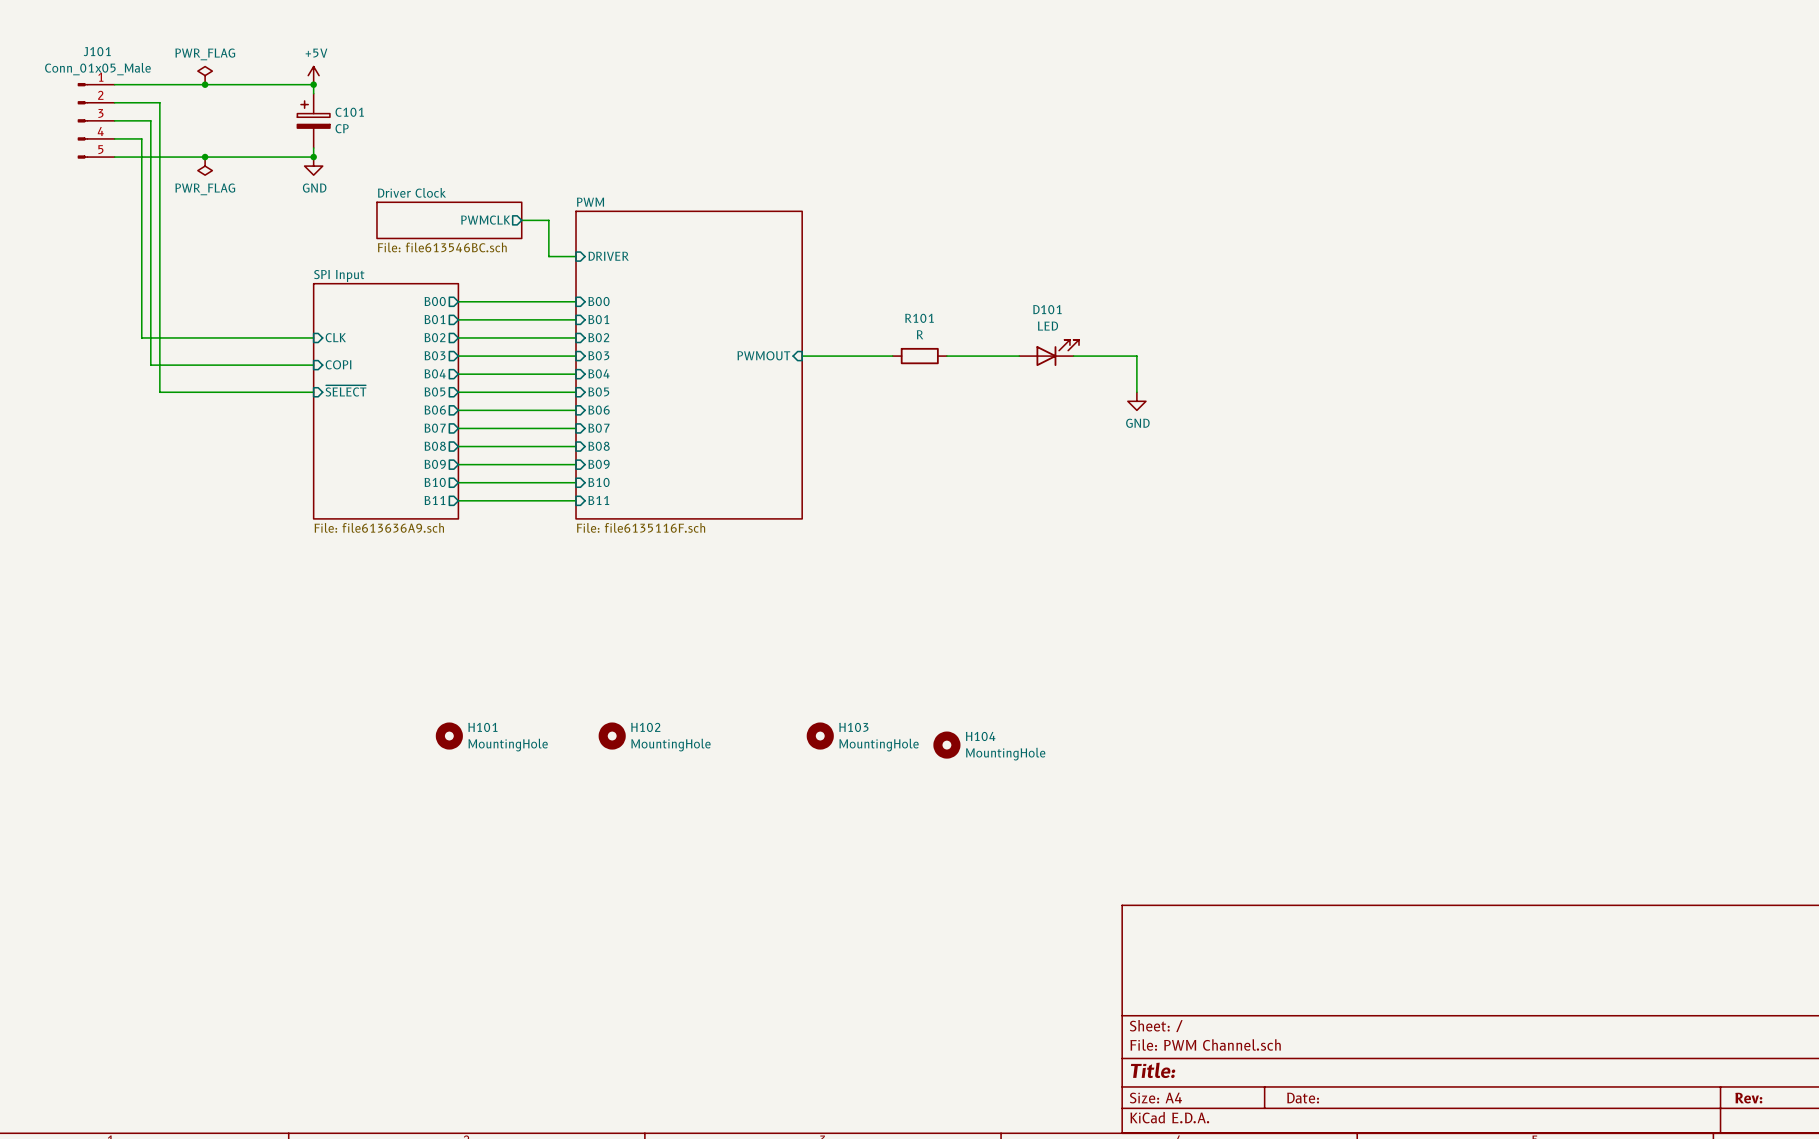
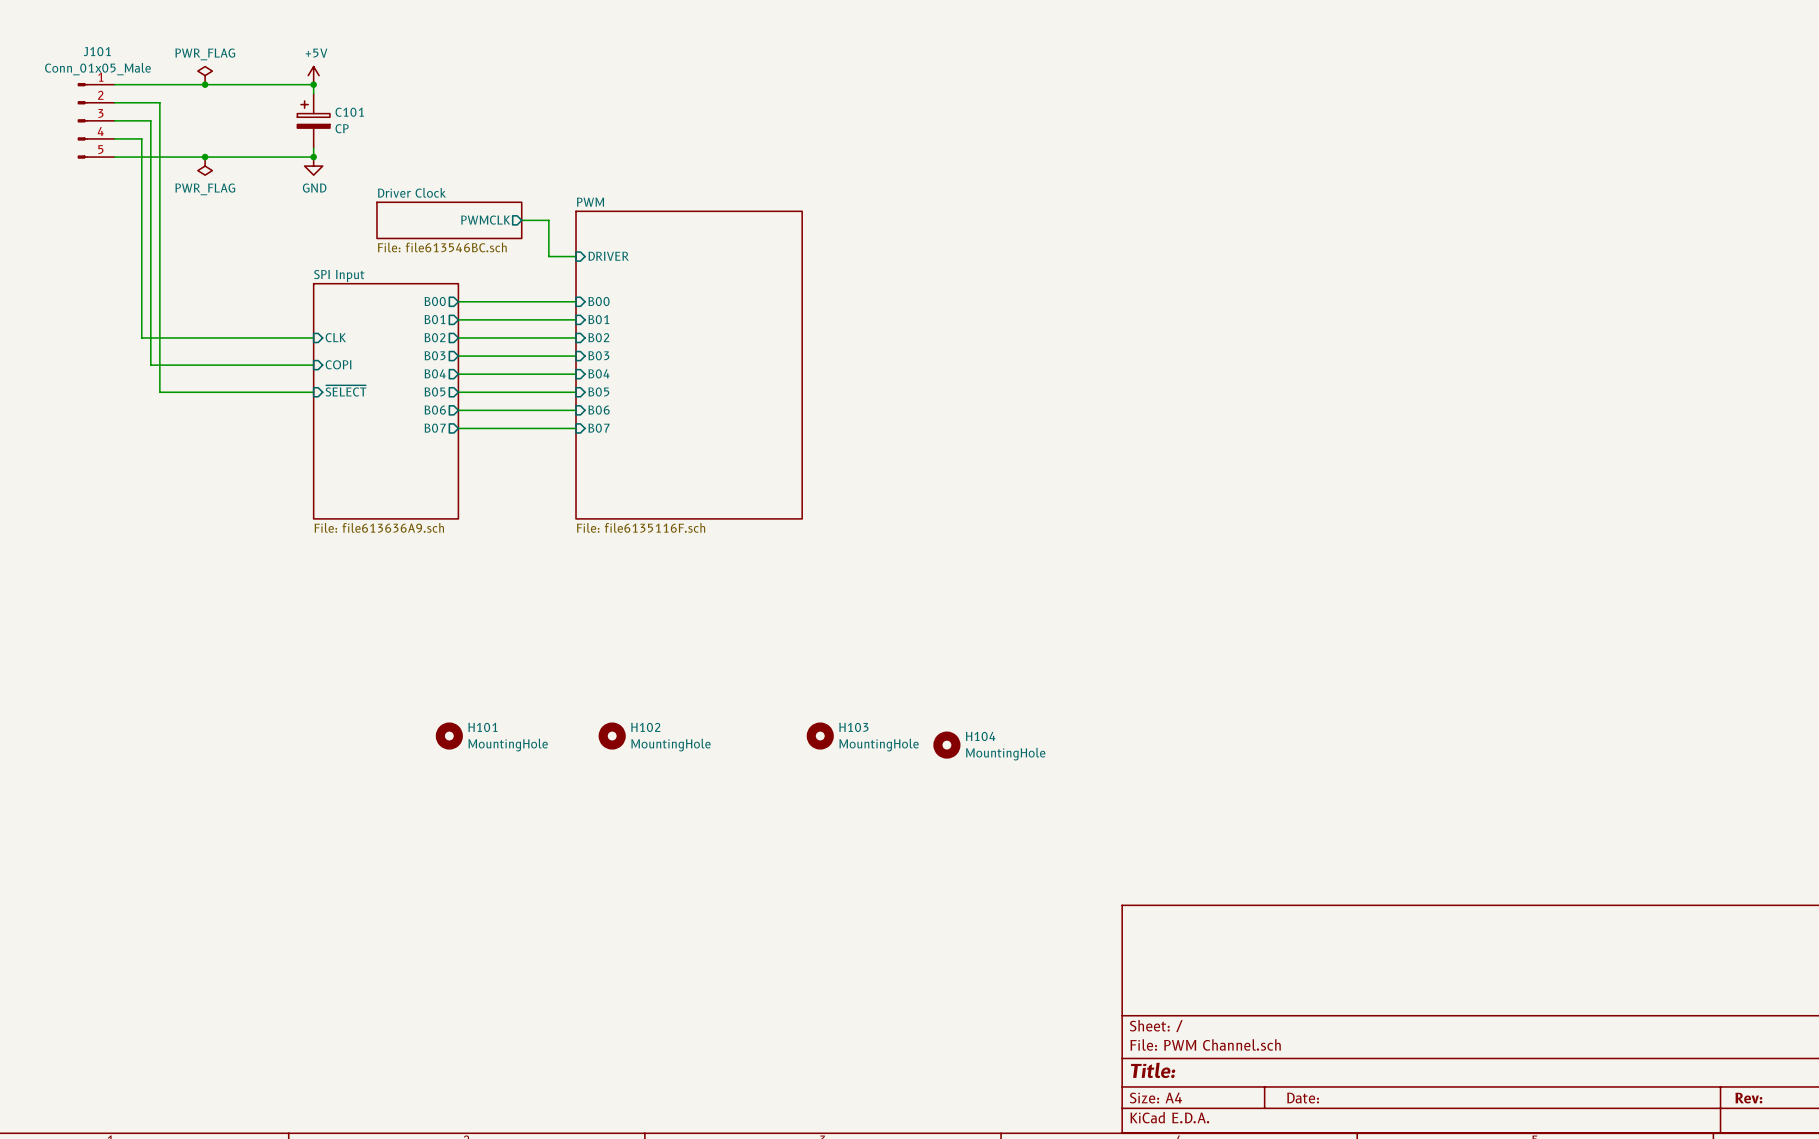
D101: LED (1049, 352) -> none
sheet pin: PWMOUT (763, 355) -> none
wire: (802, 356) (892, 356) -> none
R101: R (919, 356) -> none
wire: (946, 356) (1019, 356) -> none
wire: (1073, 356) (1136, 356) (1136, 392) -> none
power symbol: GND (1136, 401) -> none
sheet pin: B08 (435, 446) -> none
wire: (458, 446) (576, 446) -> none
sheet pin: B08 (599, 446) -> none
sheet pin: B09 (435, 464) -> none
wire: (458, 464) (576, 464) -> none
sheet pin: B09 (599, 464) -> none
sheet pin: B10 (435, 482) -> none
wire: (458, 482) (576, 482) -> none
sheet pin: B10 (599, 482) -> none
sheet pin: B11 (435, 500) -> none
wire: (458, 500) (576, 500) -> none
sheet pin: B11 (598, 500) -> none

